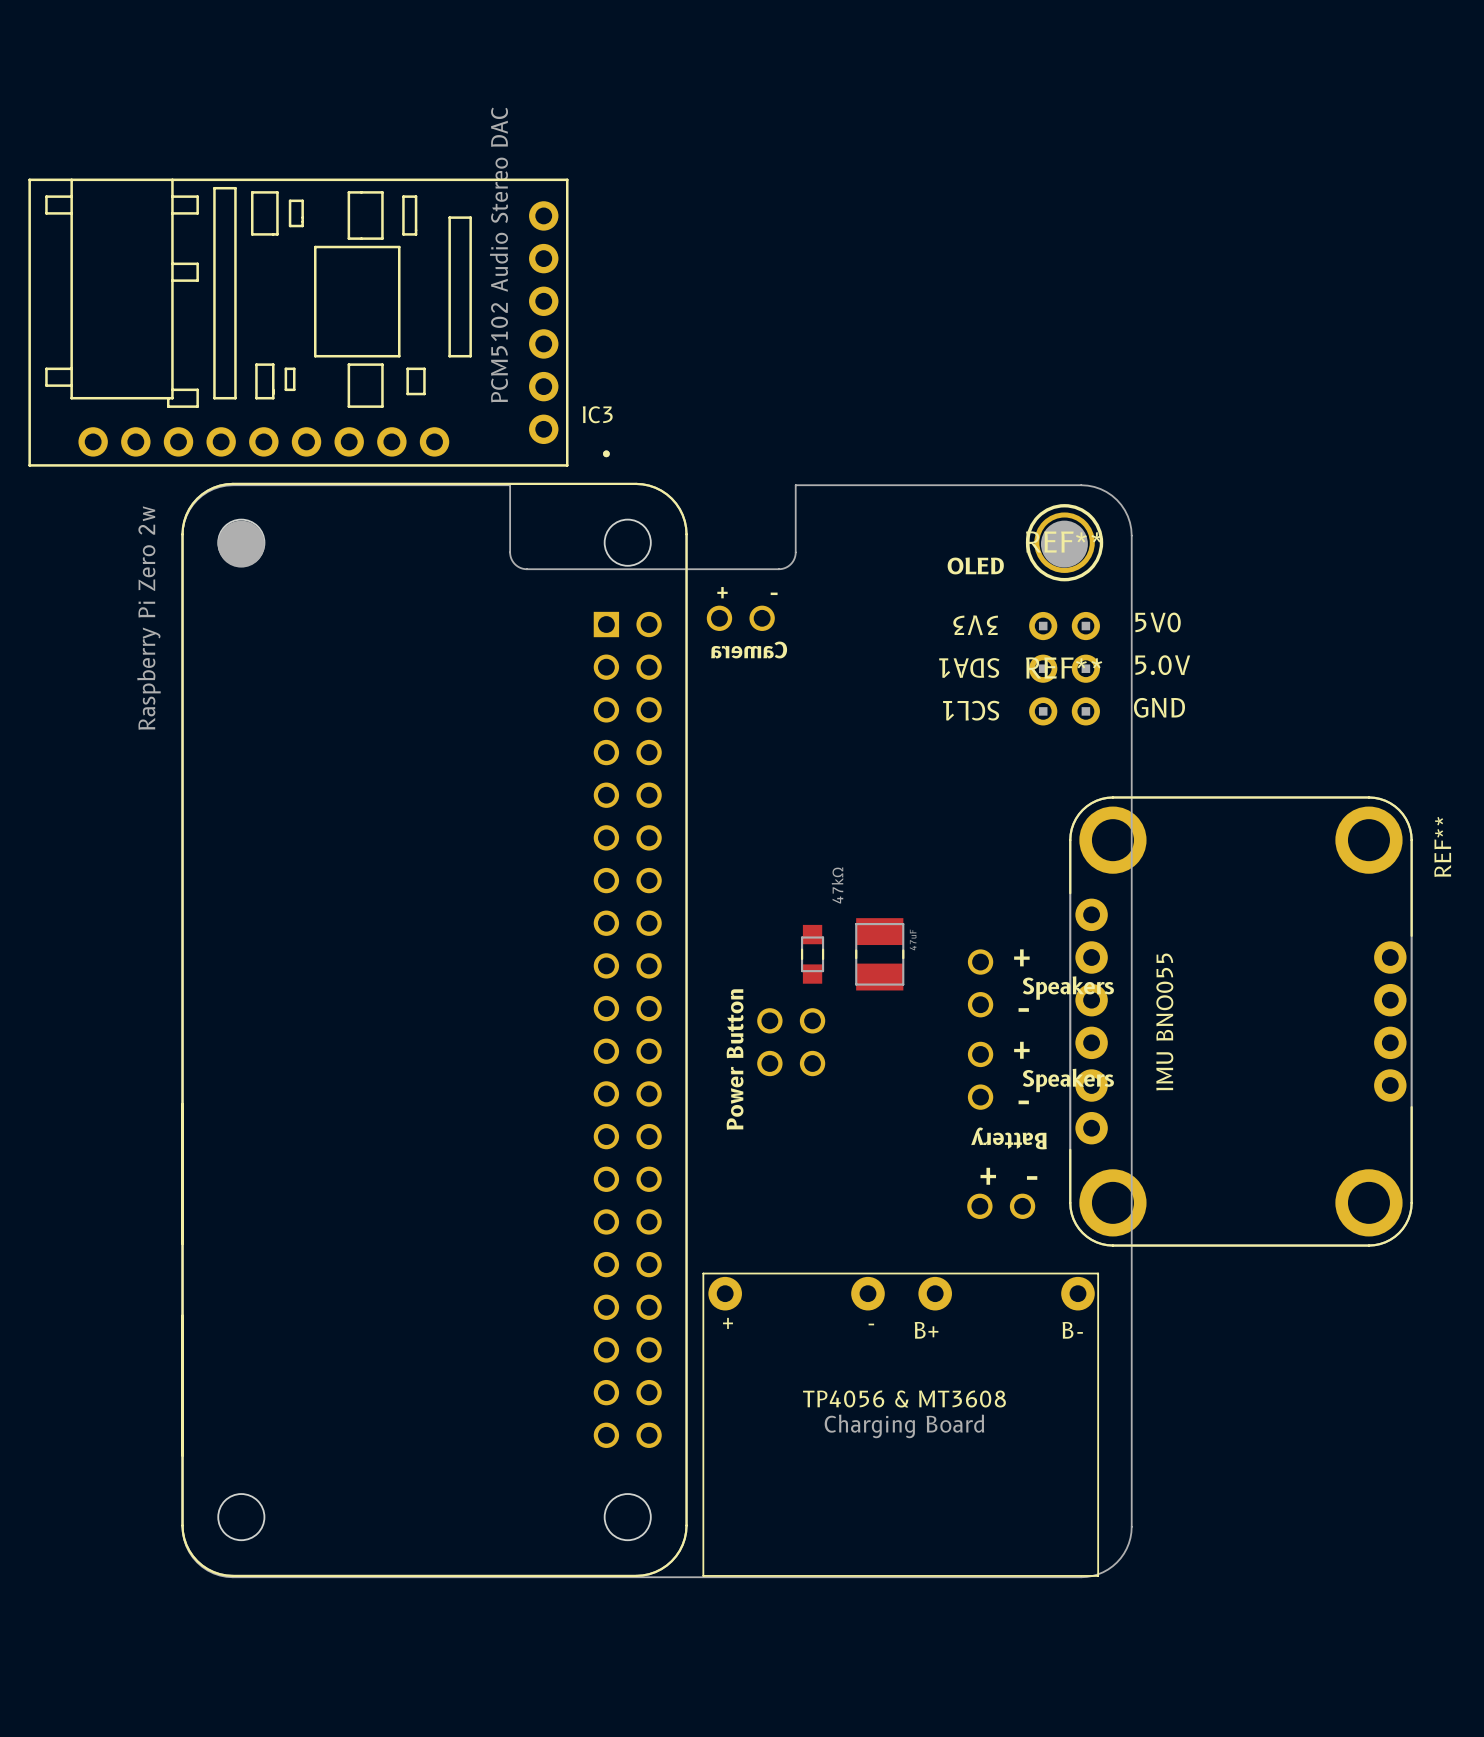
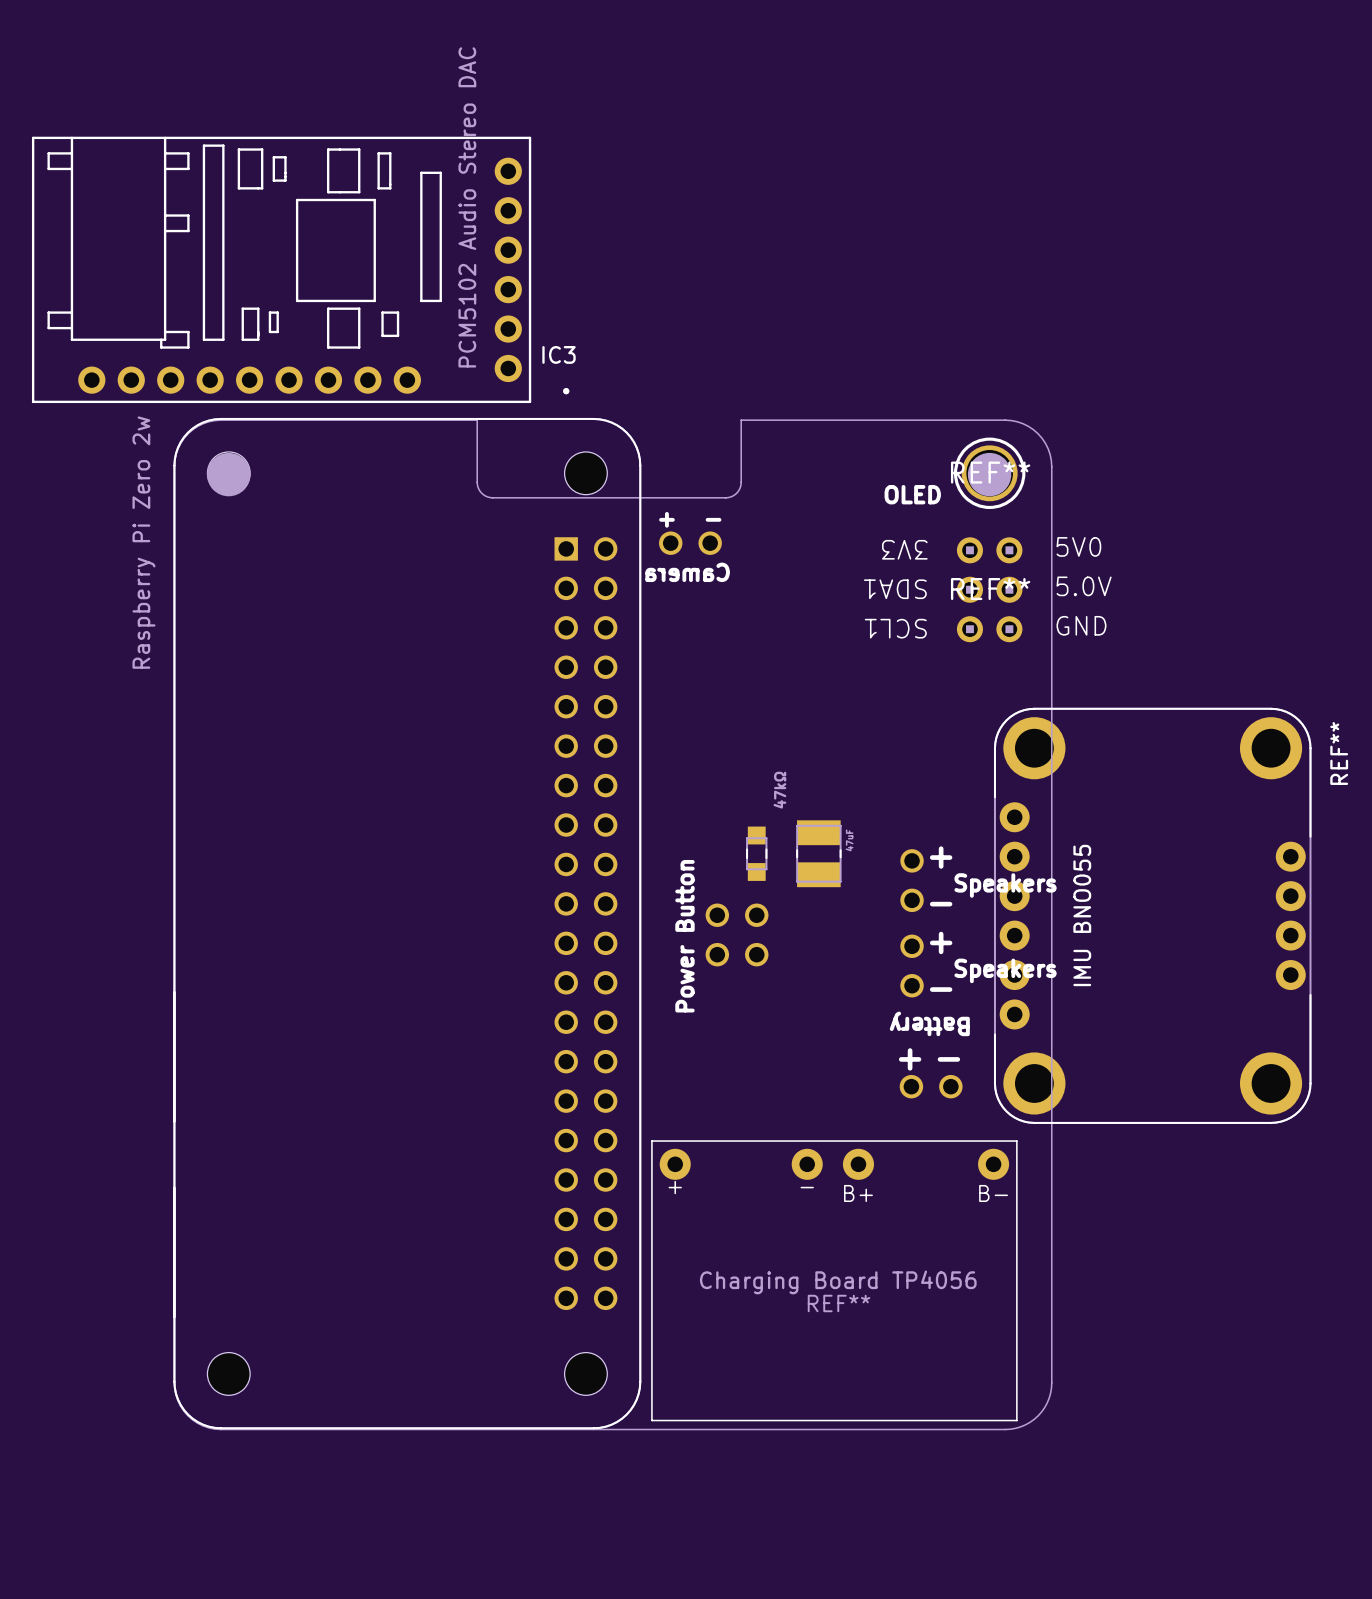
part: none -> Charging Board TP4056 (834, 1280)
TP4056 & MT3608: Charging Board (900, 1424) -> none

